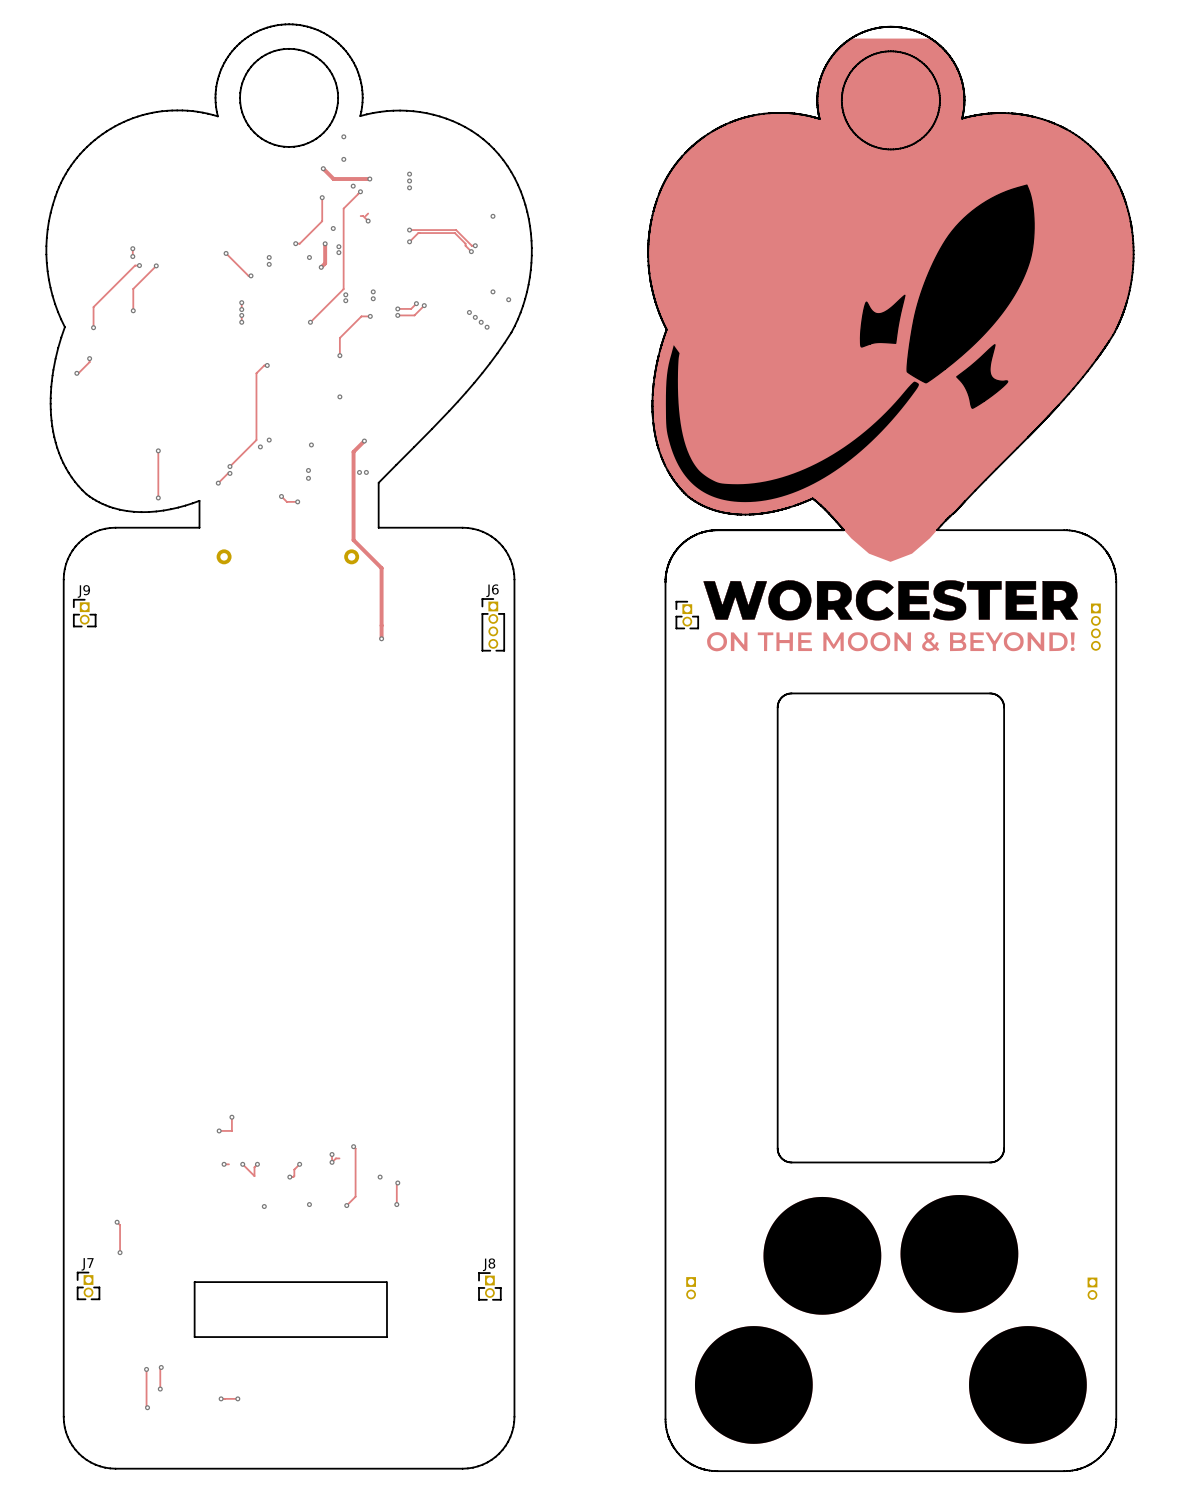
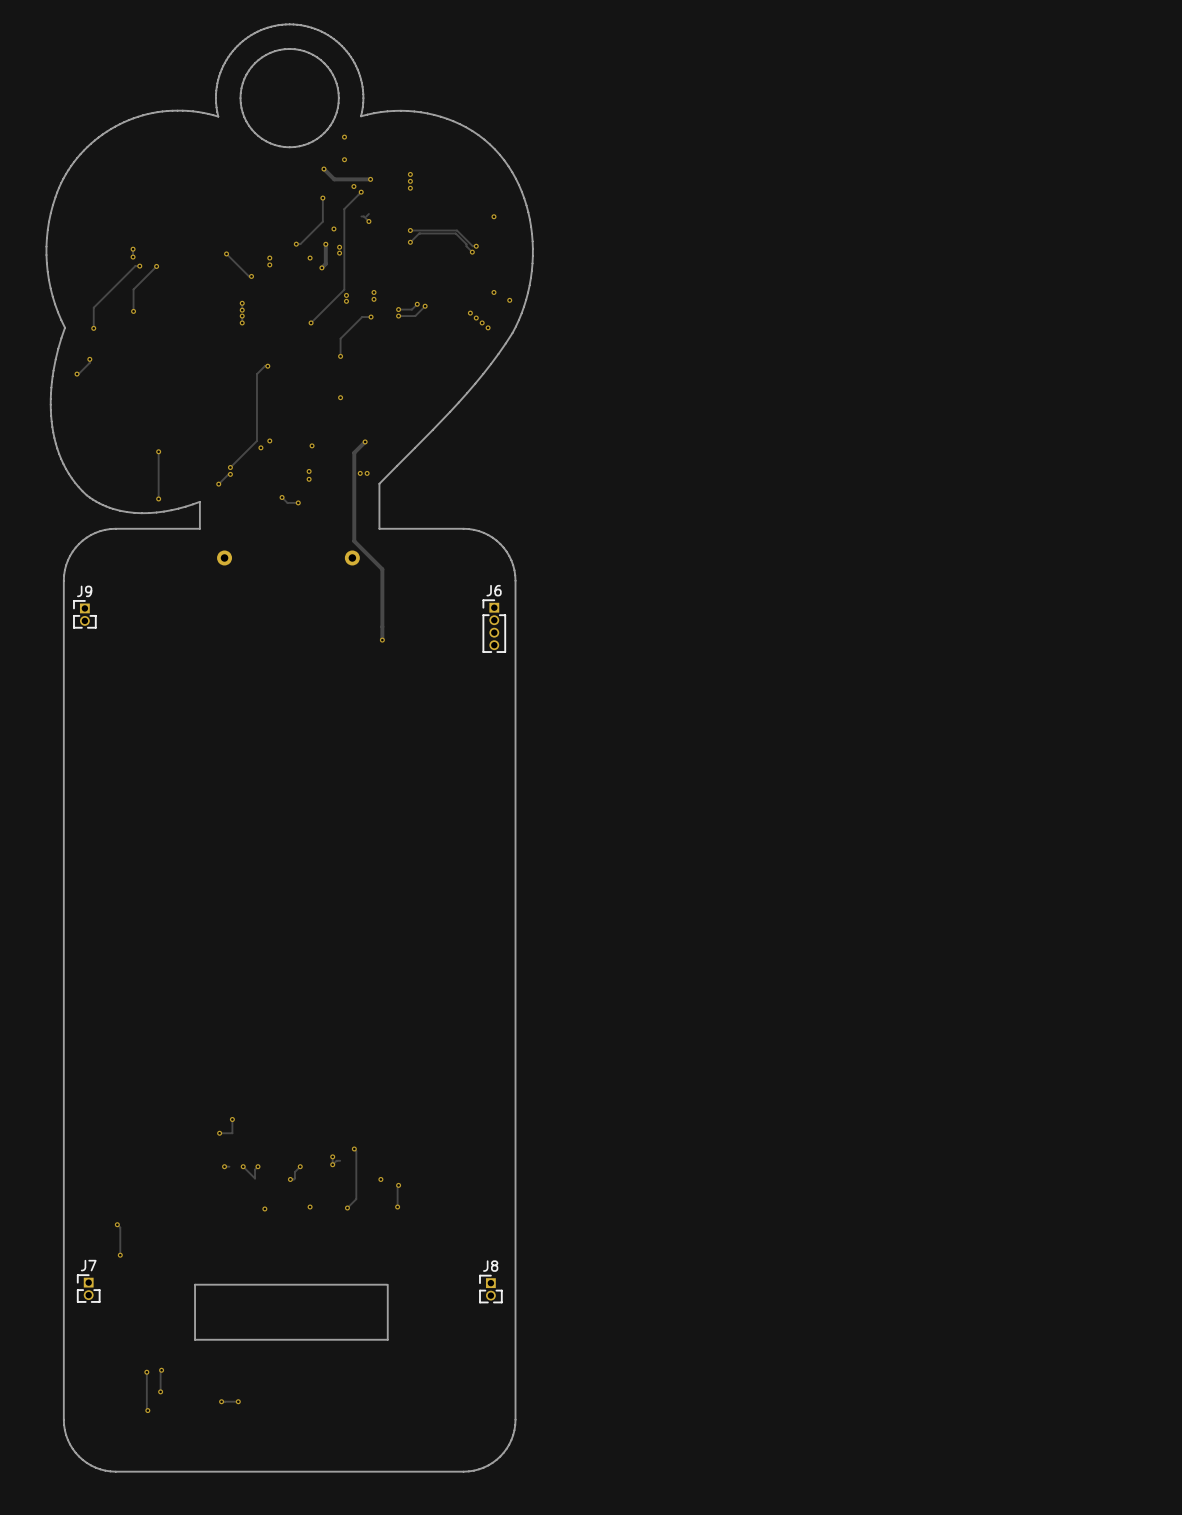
drawing: [647, 26, 1135, 1472] -> none
part: (687, 615) -> none
part: (1095, 627) -> none
part: (691, 1288) -> none
part: (1092, 1288) -> none

